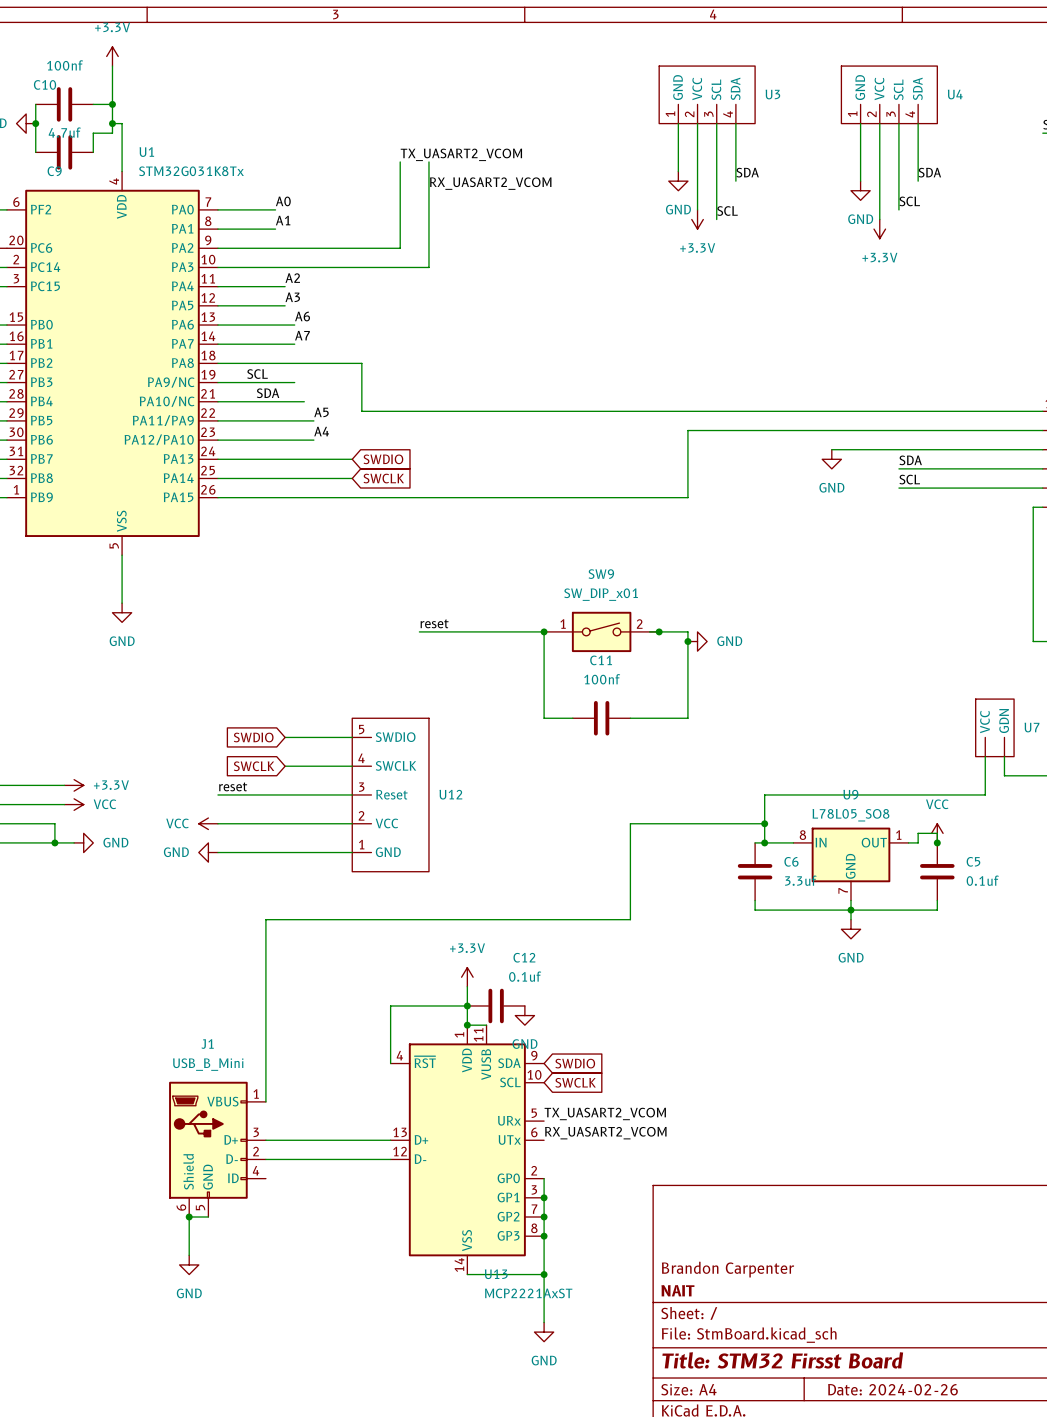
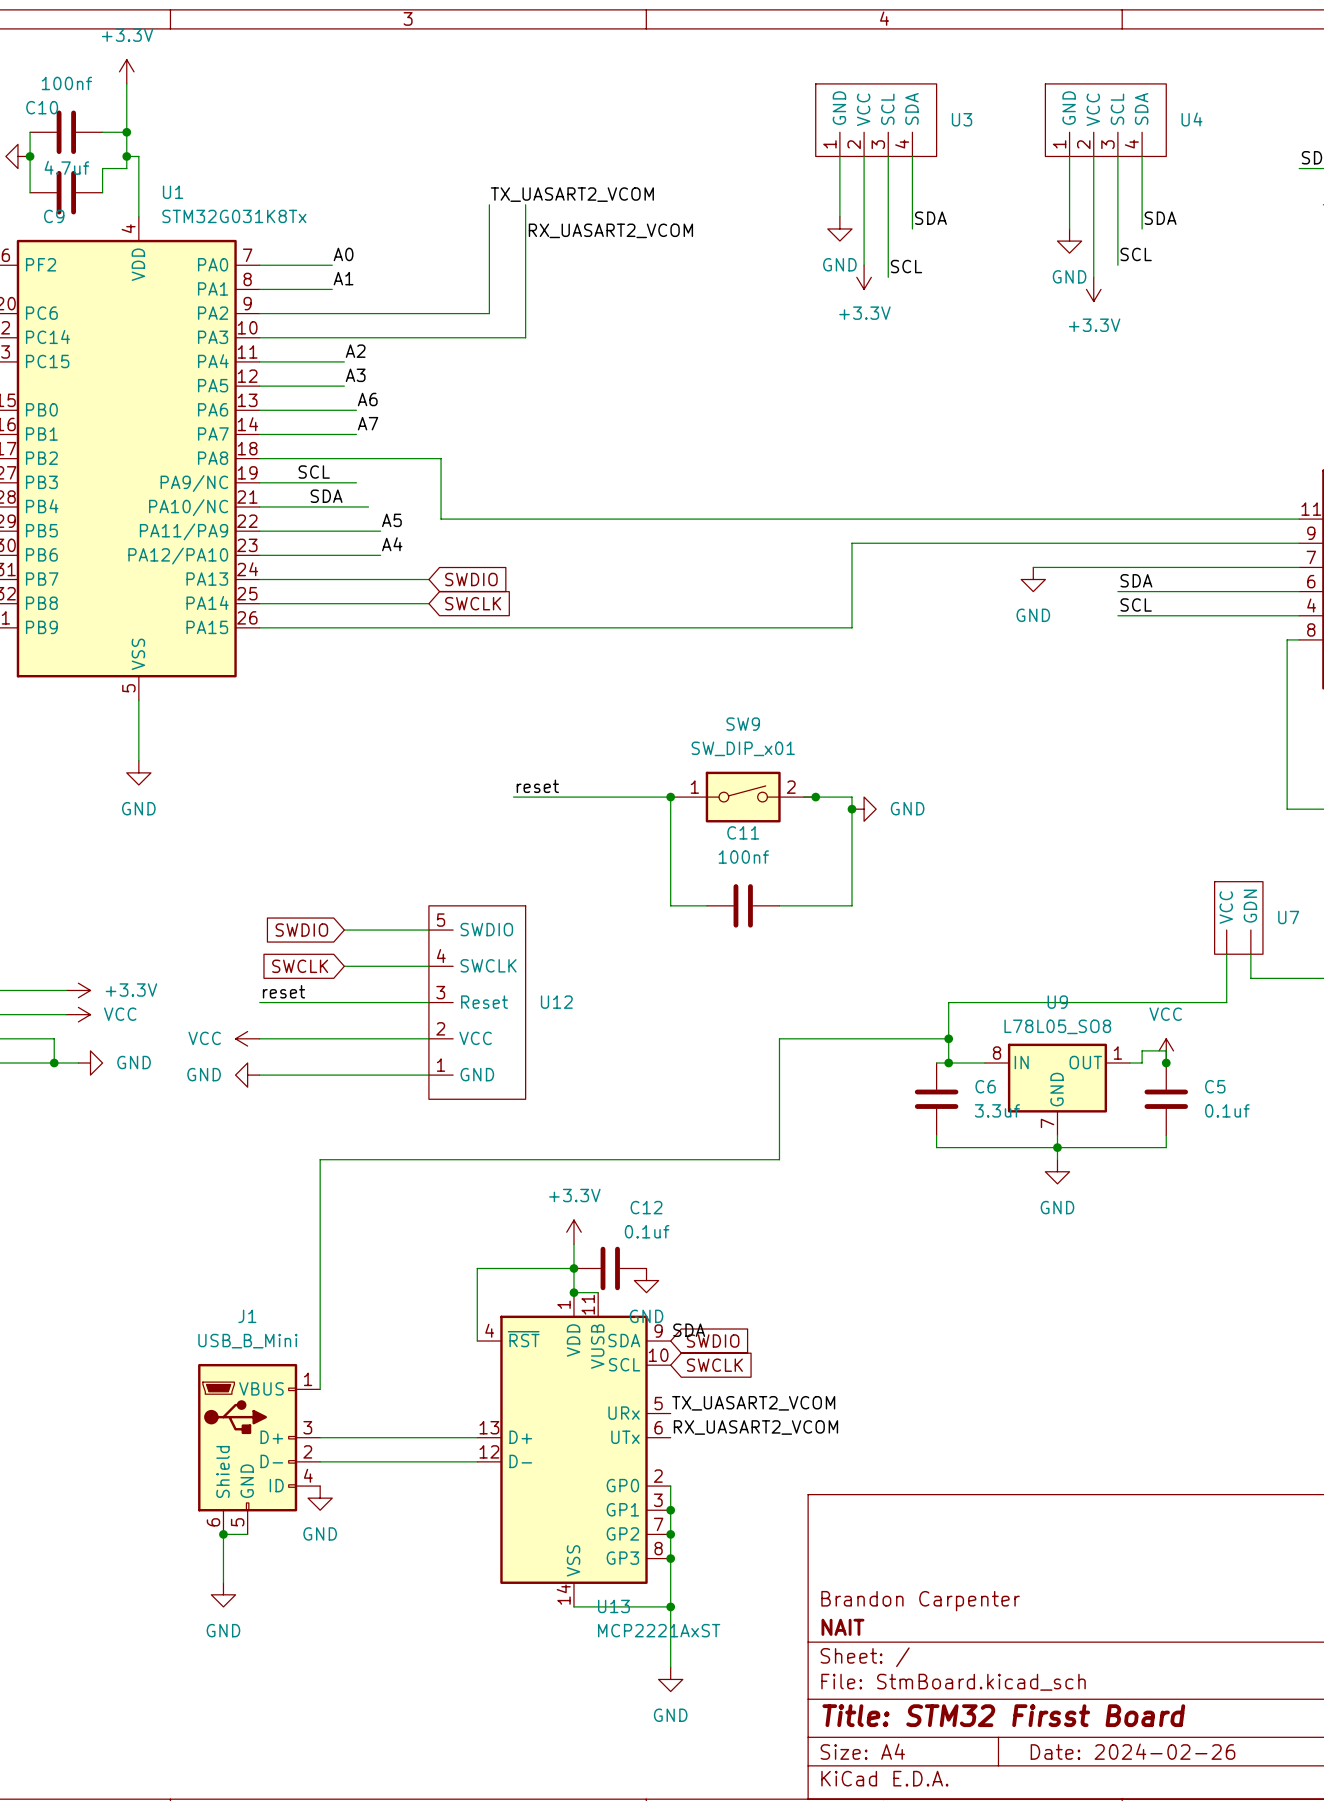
label: none -> SDA (689, 1330)
power symbol: none -> GND (320, 1498)

